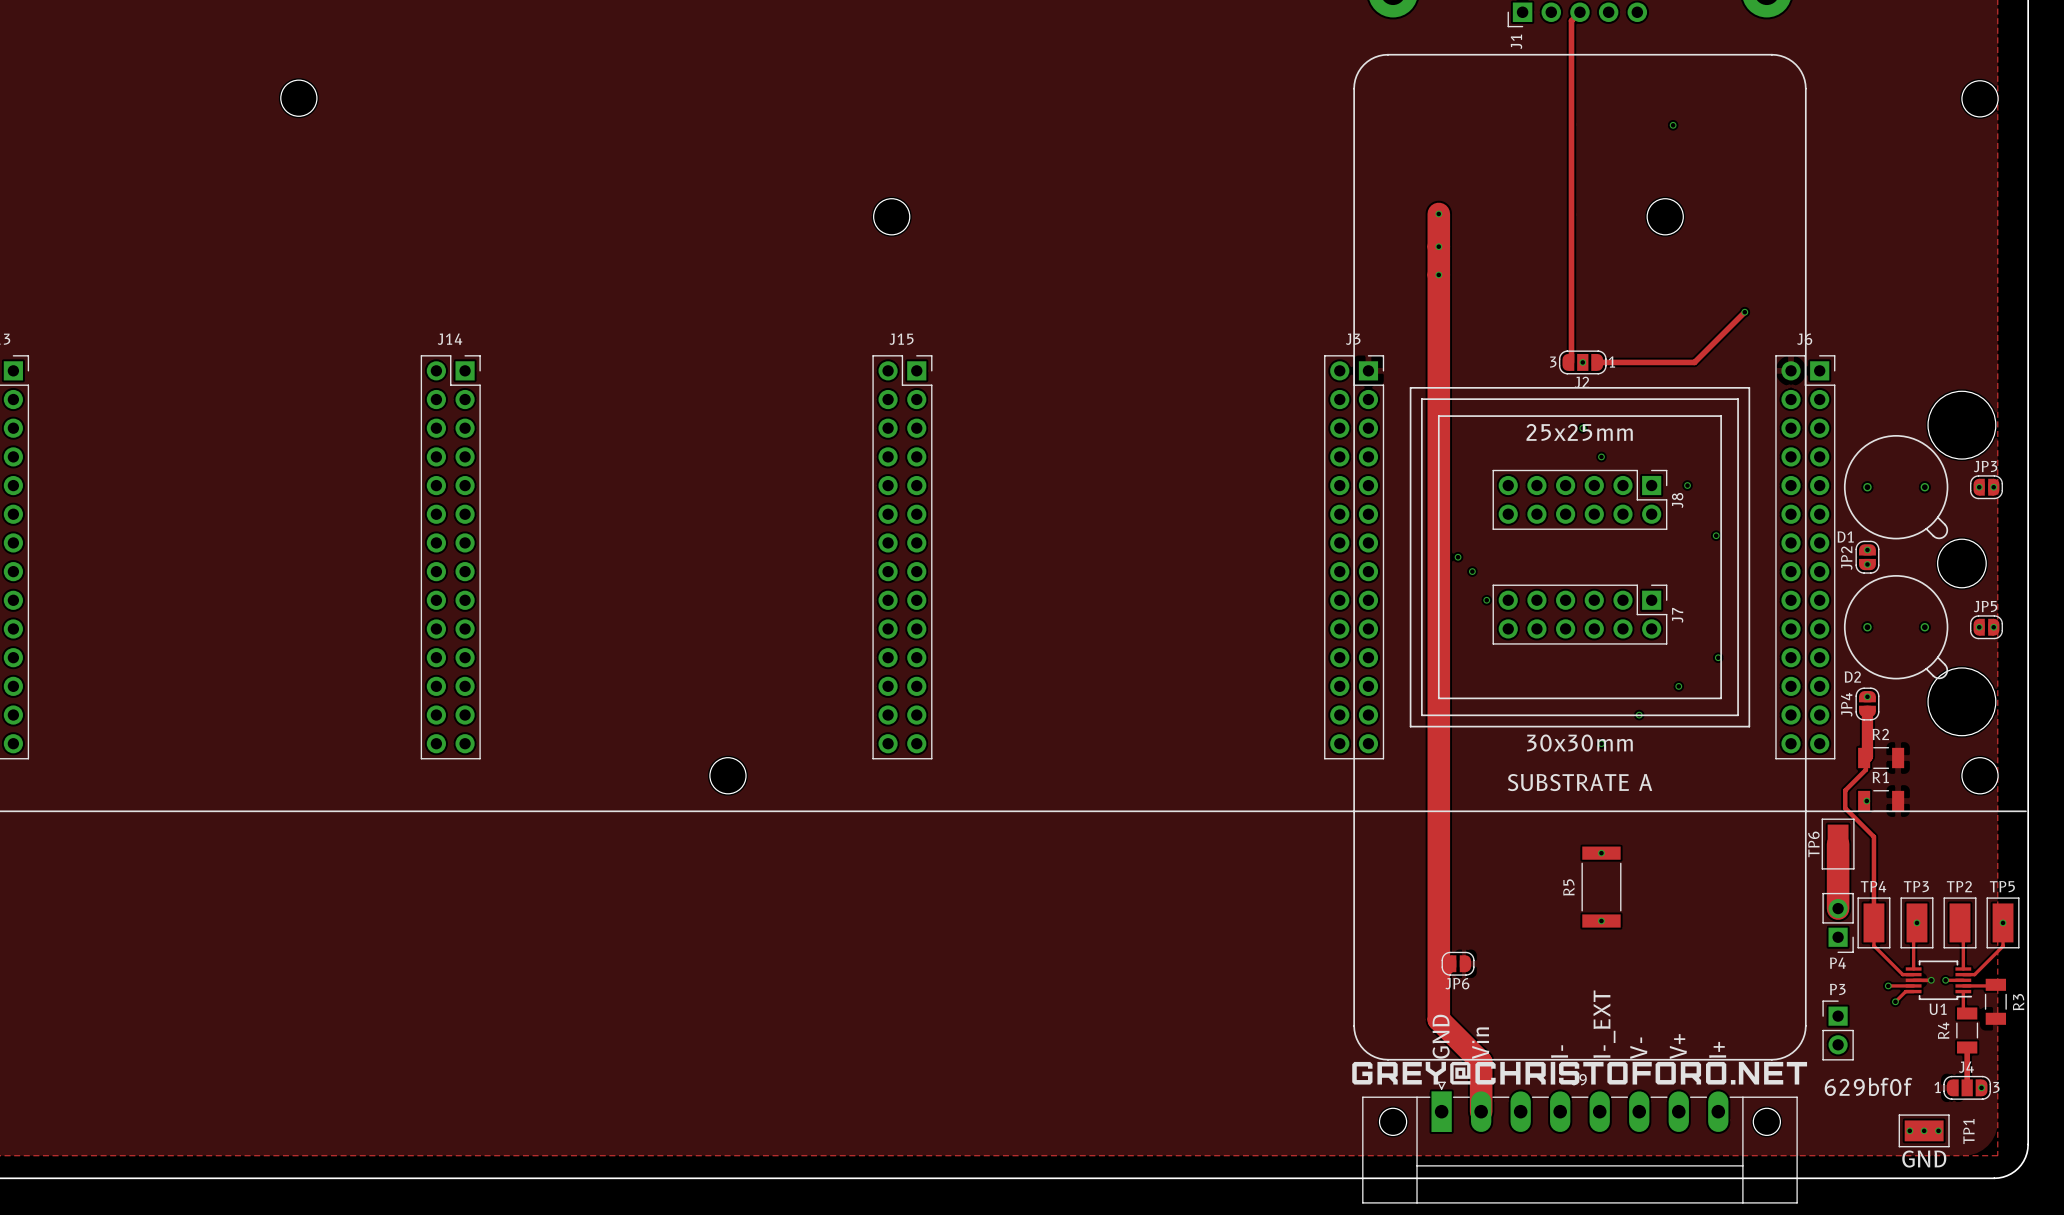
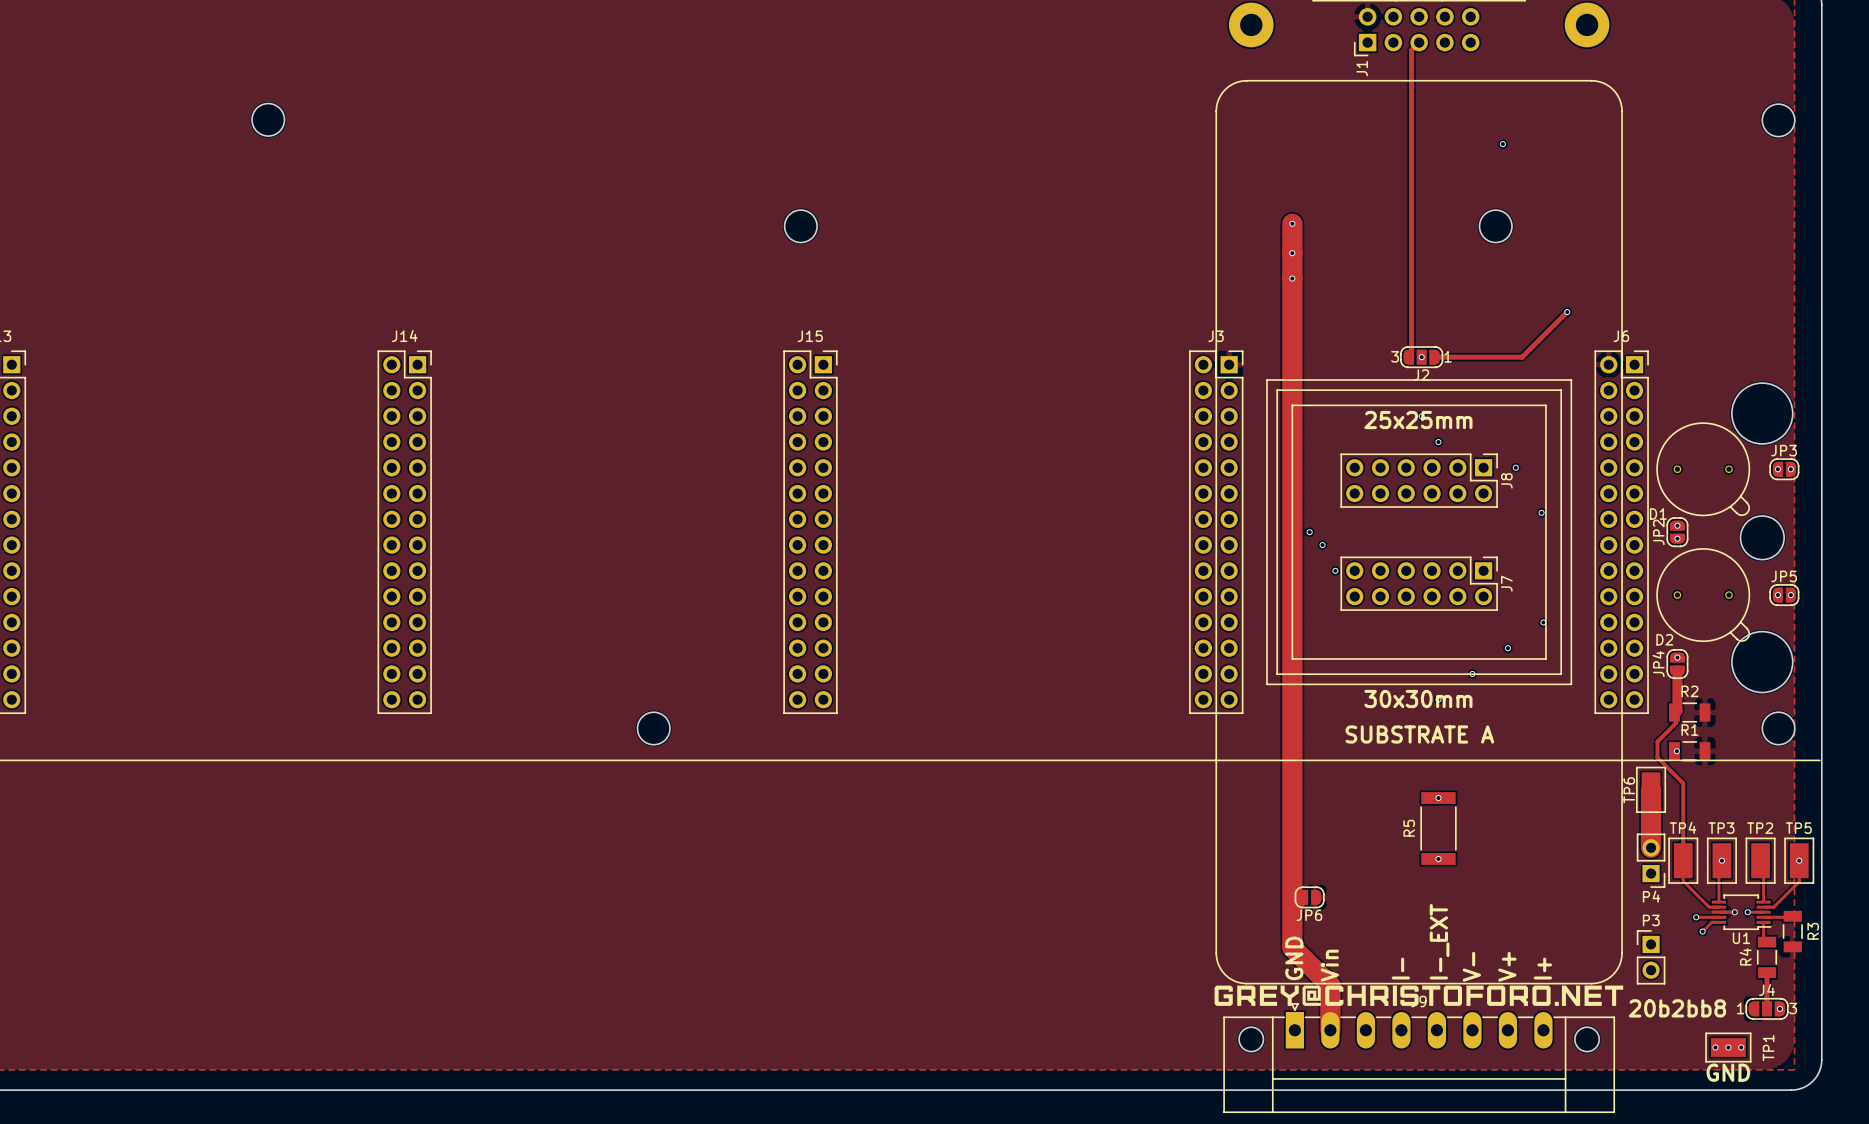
text: 629bf0f (1868, 1086) -> 20b2bb8 (1677, 1008)

